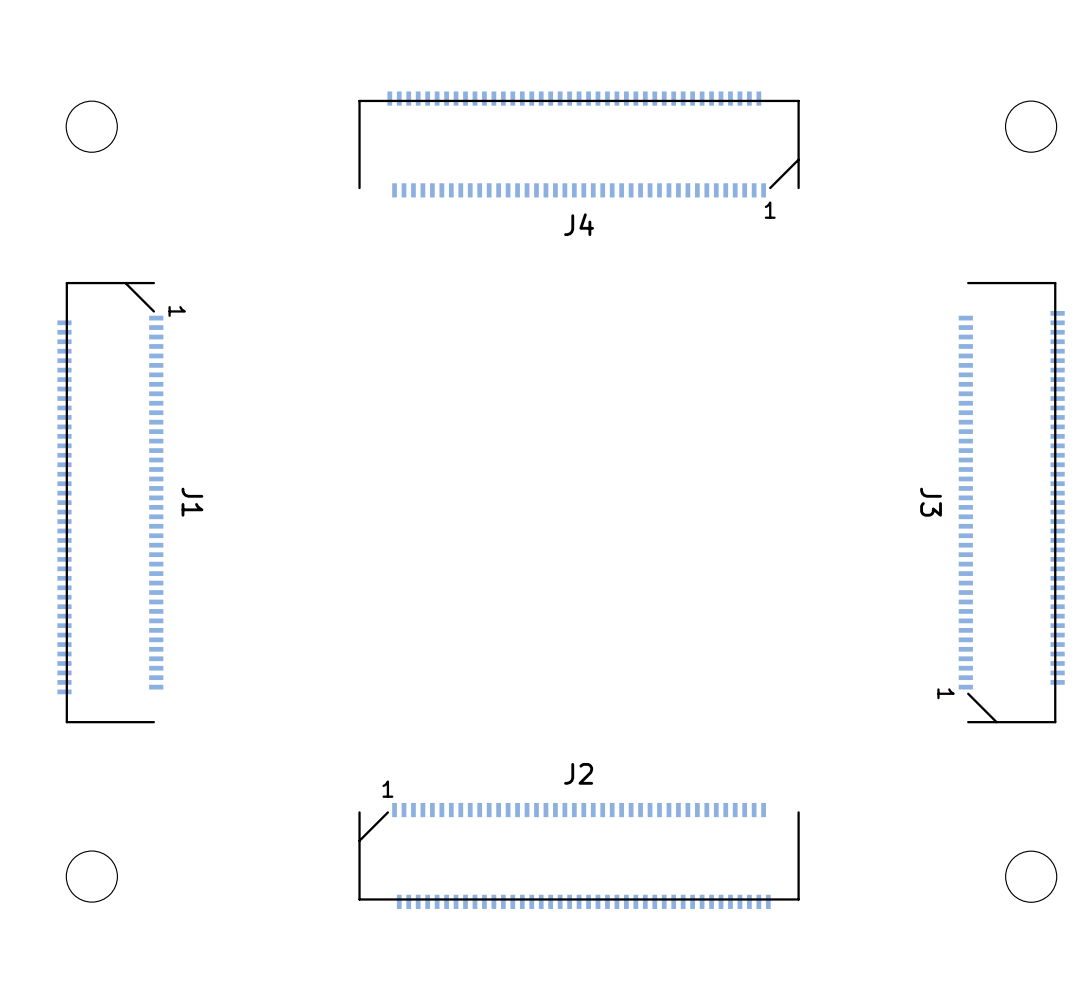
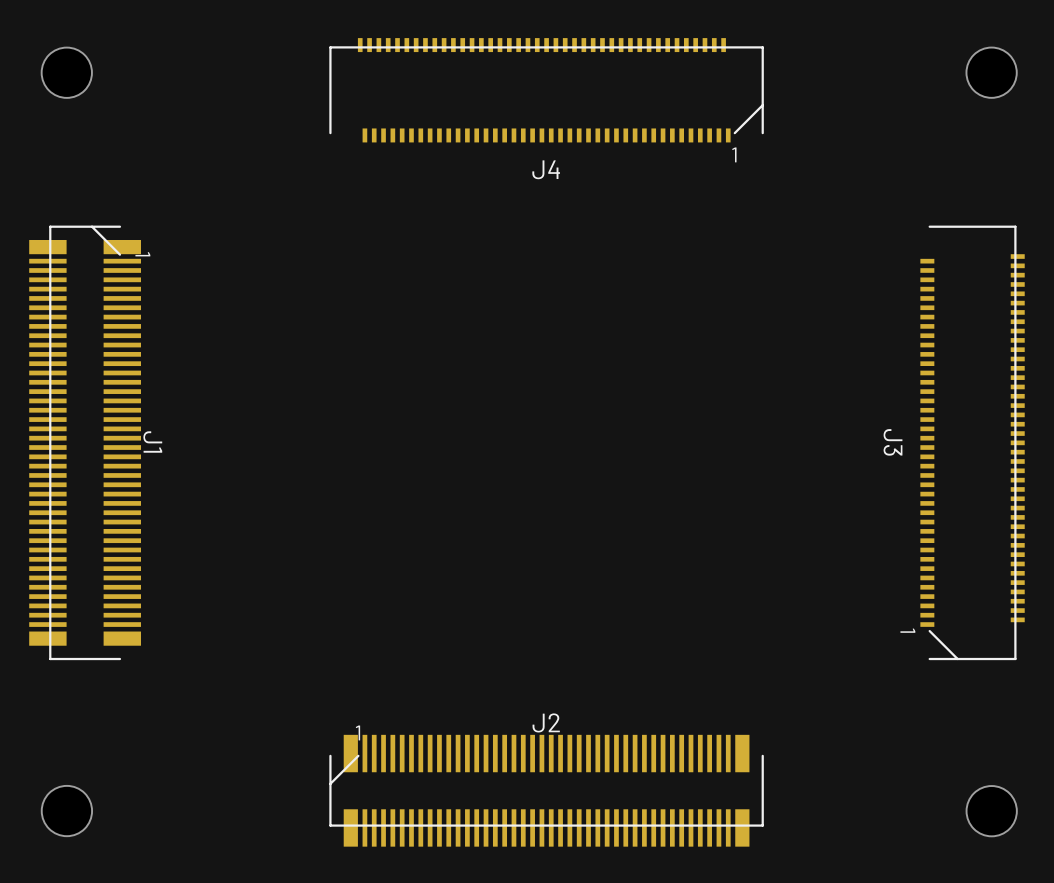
J1 footprint: [57, 281, 164, 724] -> [29, 225, 142, 661]
J2 footprint: [358, 802, 800, 909] -> [329, 734, 764, 847]

